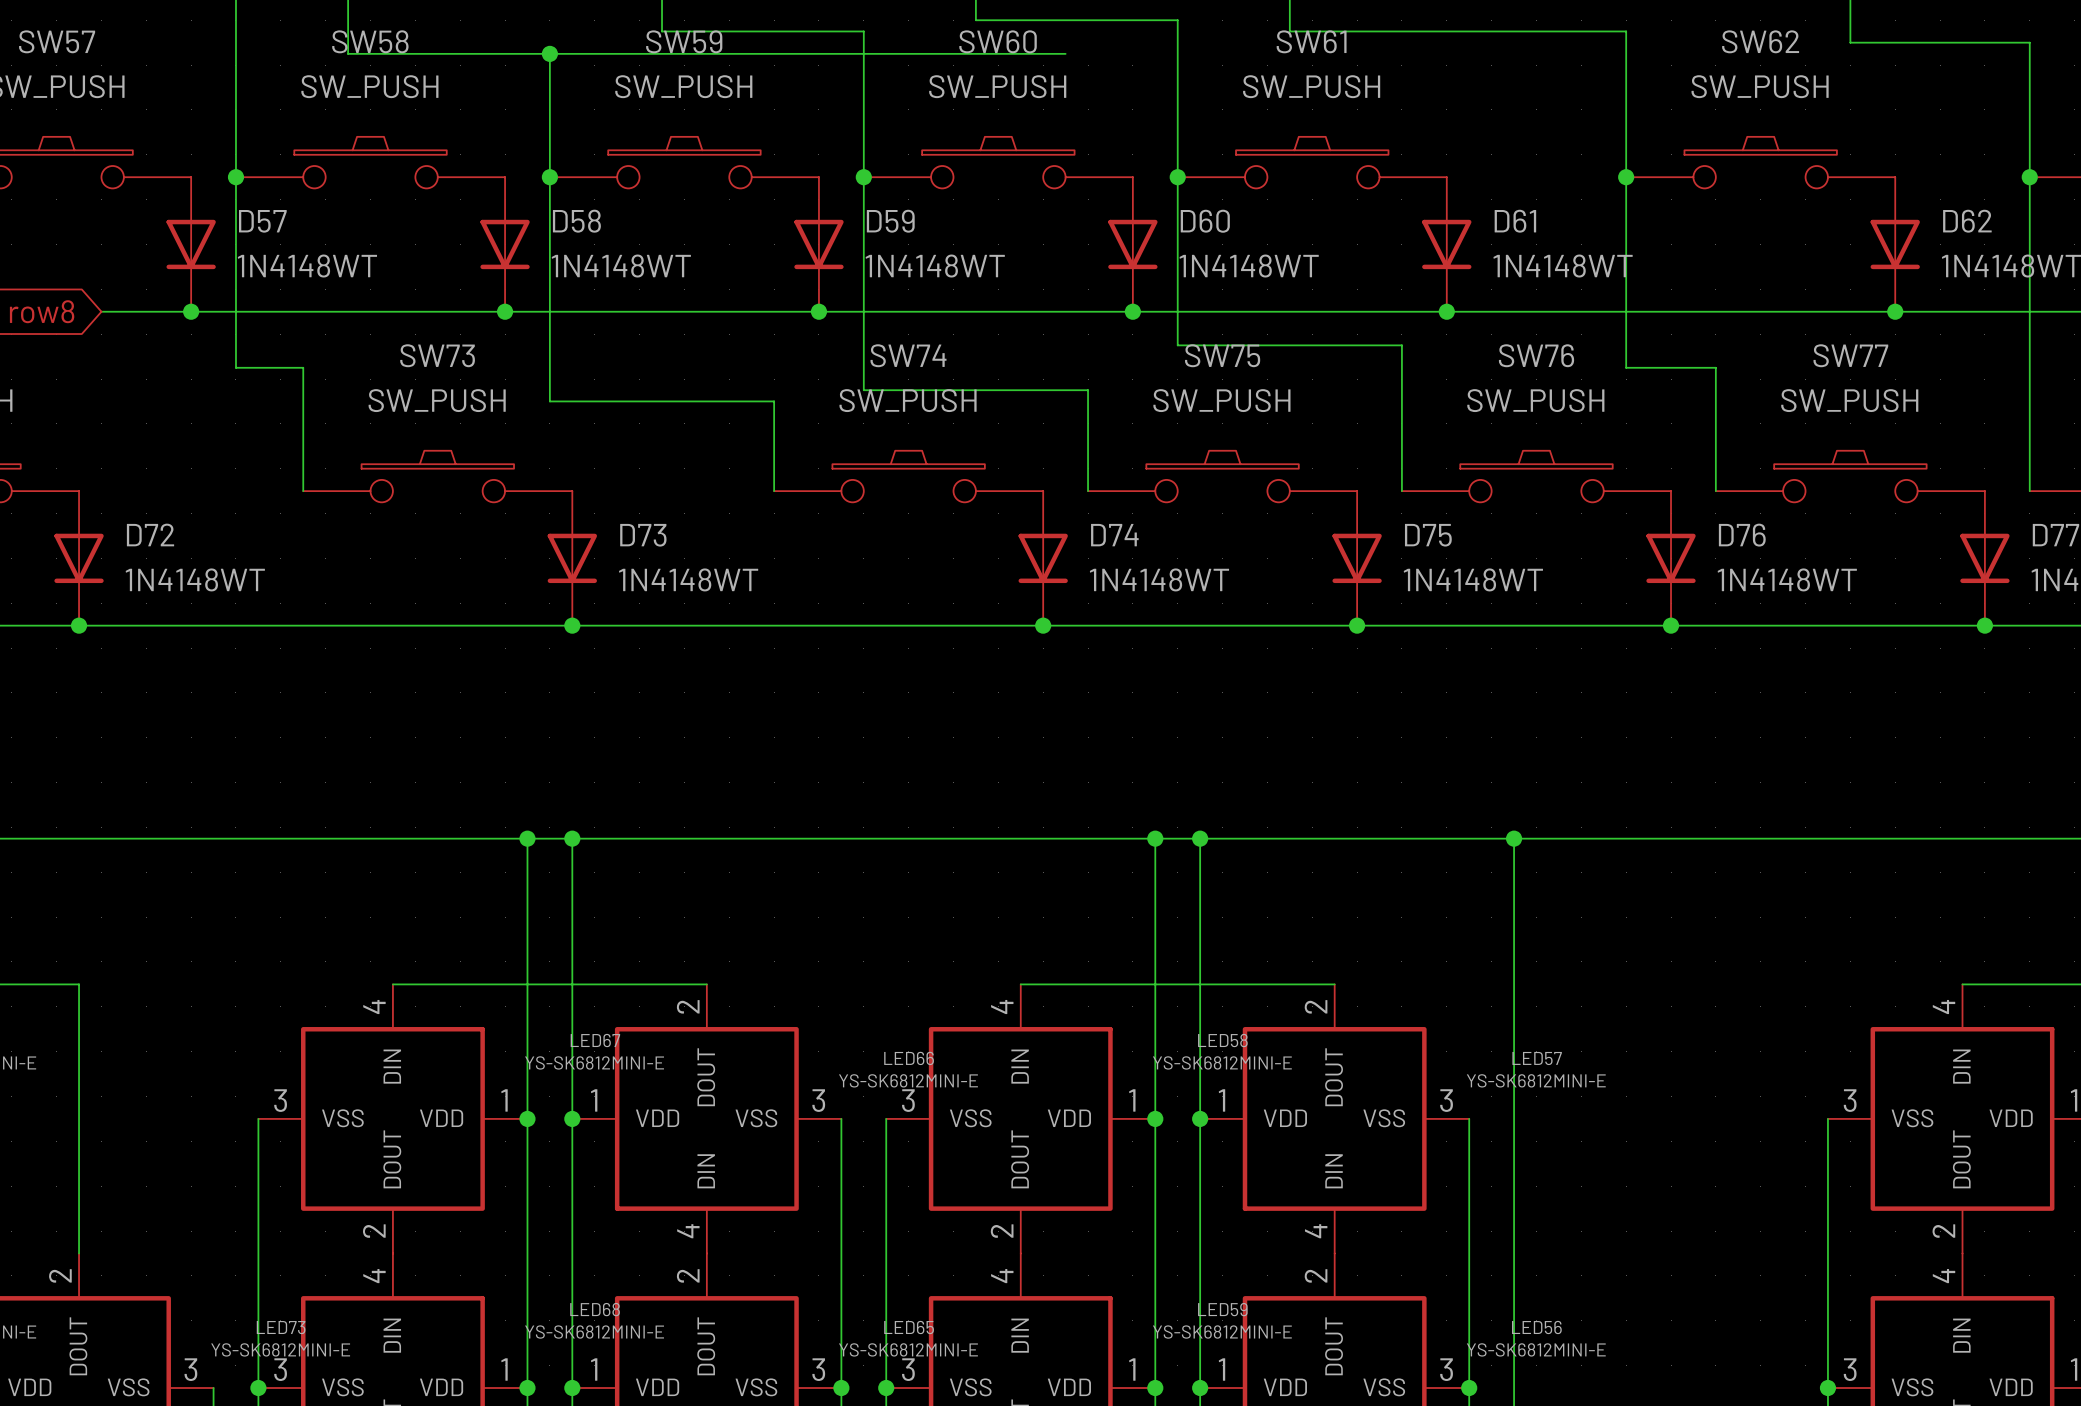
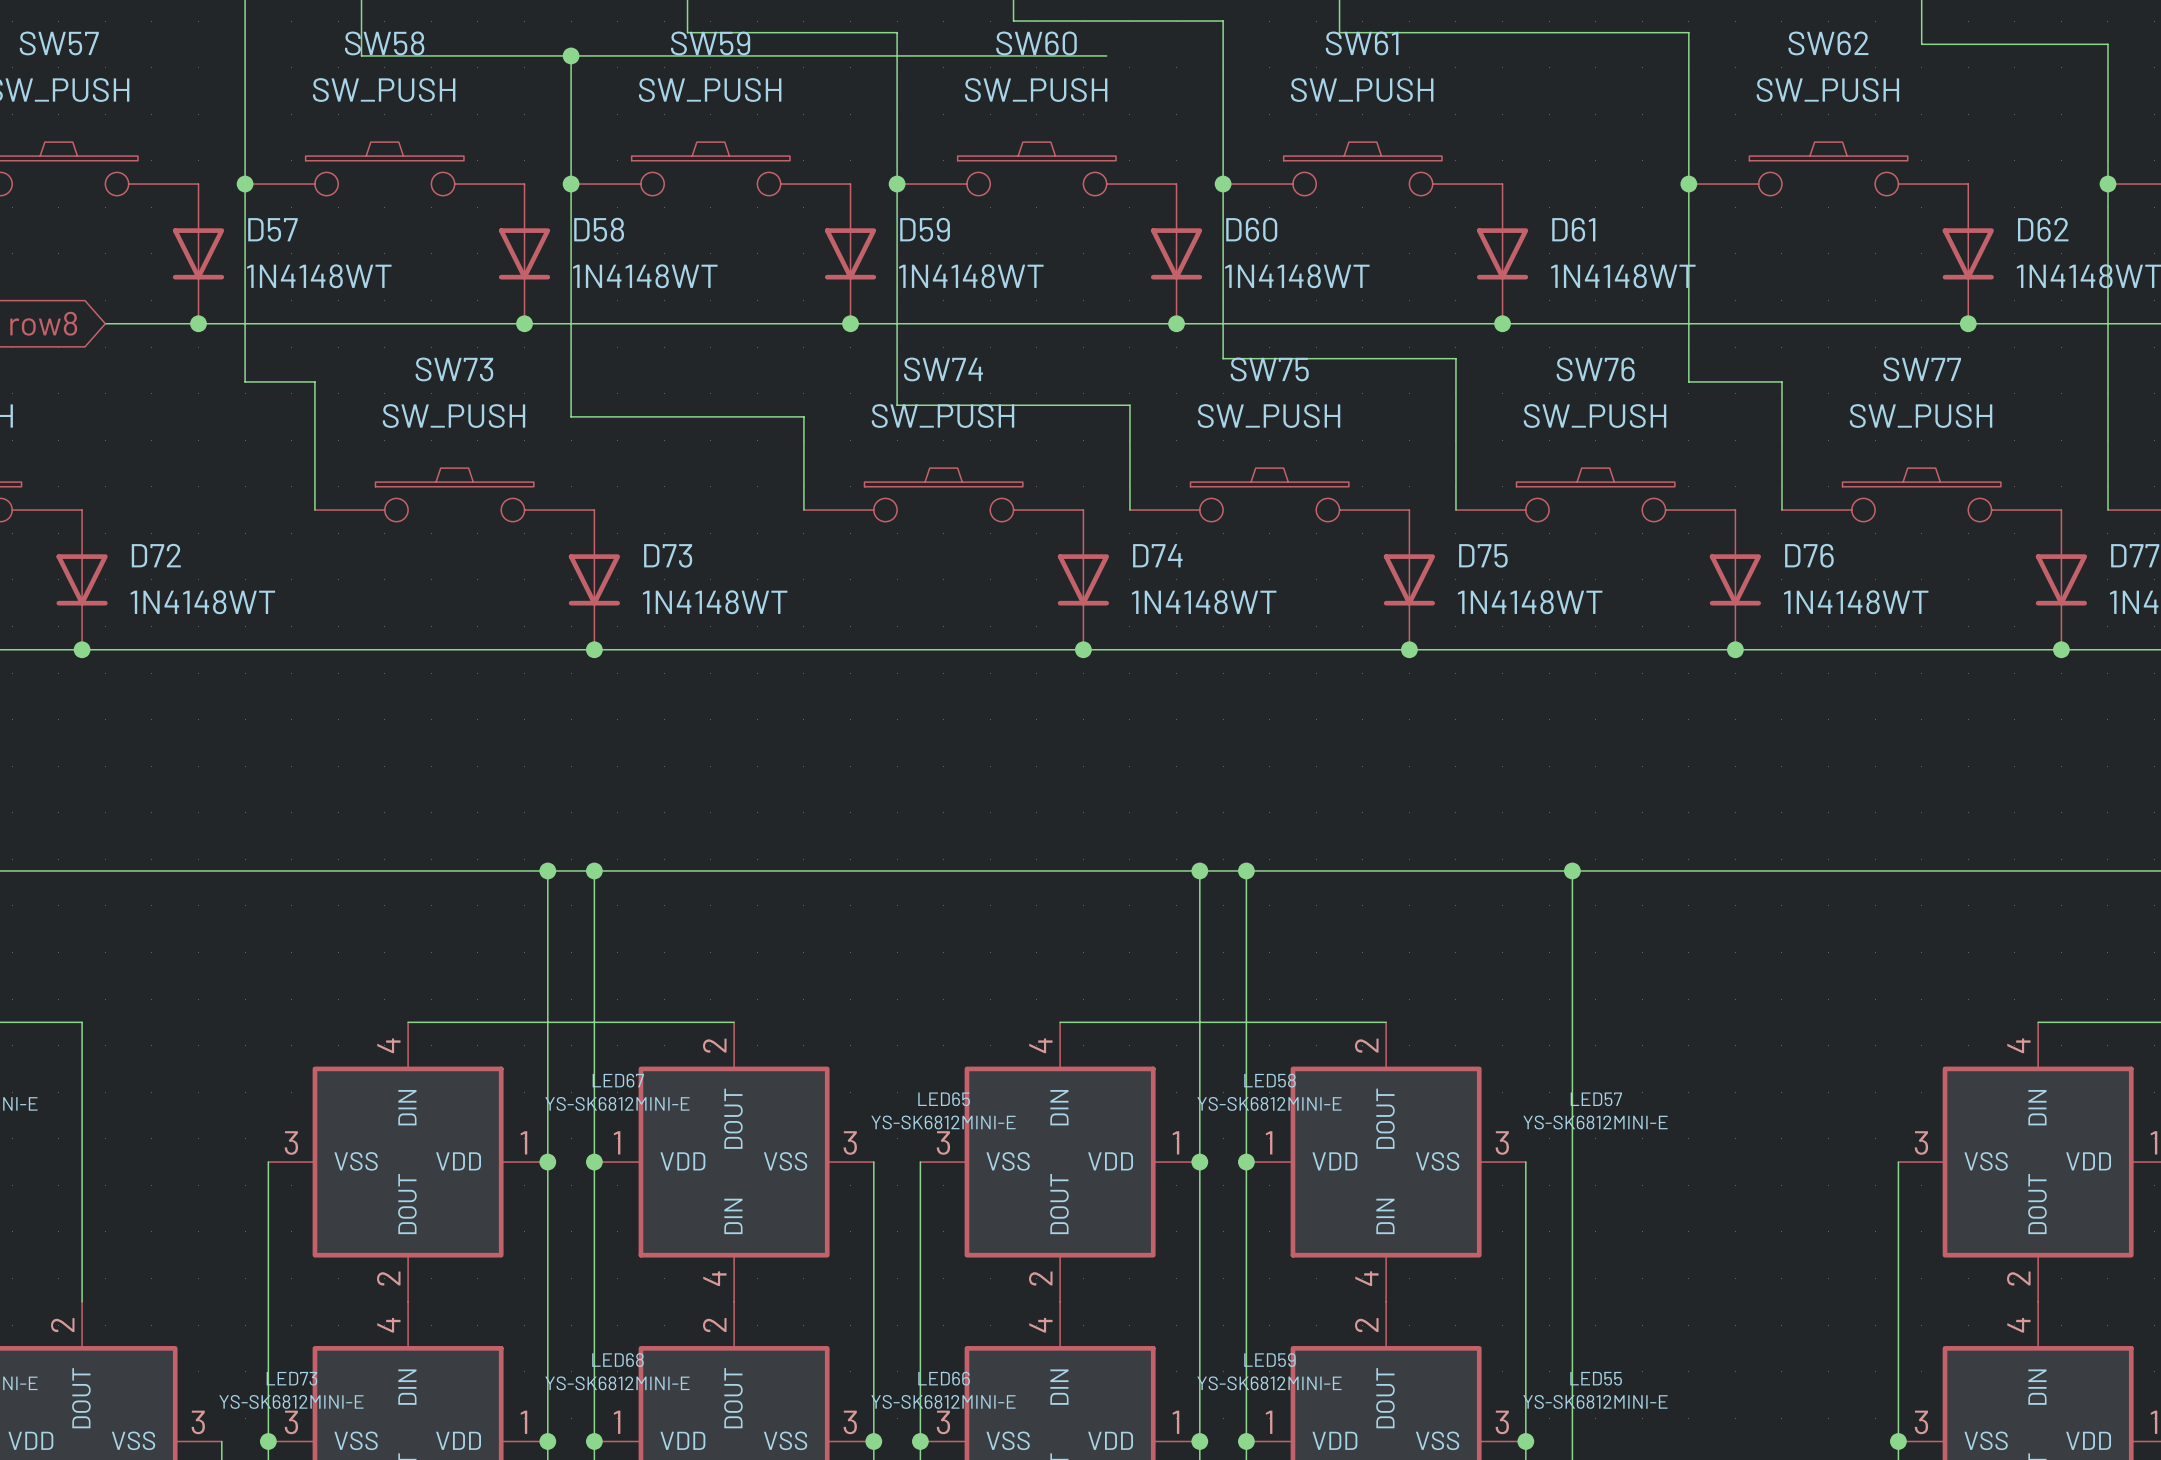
LED66 name: LED66 (909, 1058) -> LED65 (944, 1099)
LED65 name: LED65 (909, 1327) -> LED66 (944, 1378)
LED56 name: LED56 (1536, 1327) -> LED55 (1596, 1378)

